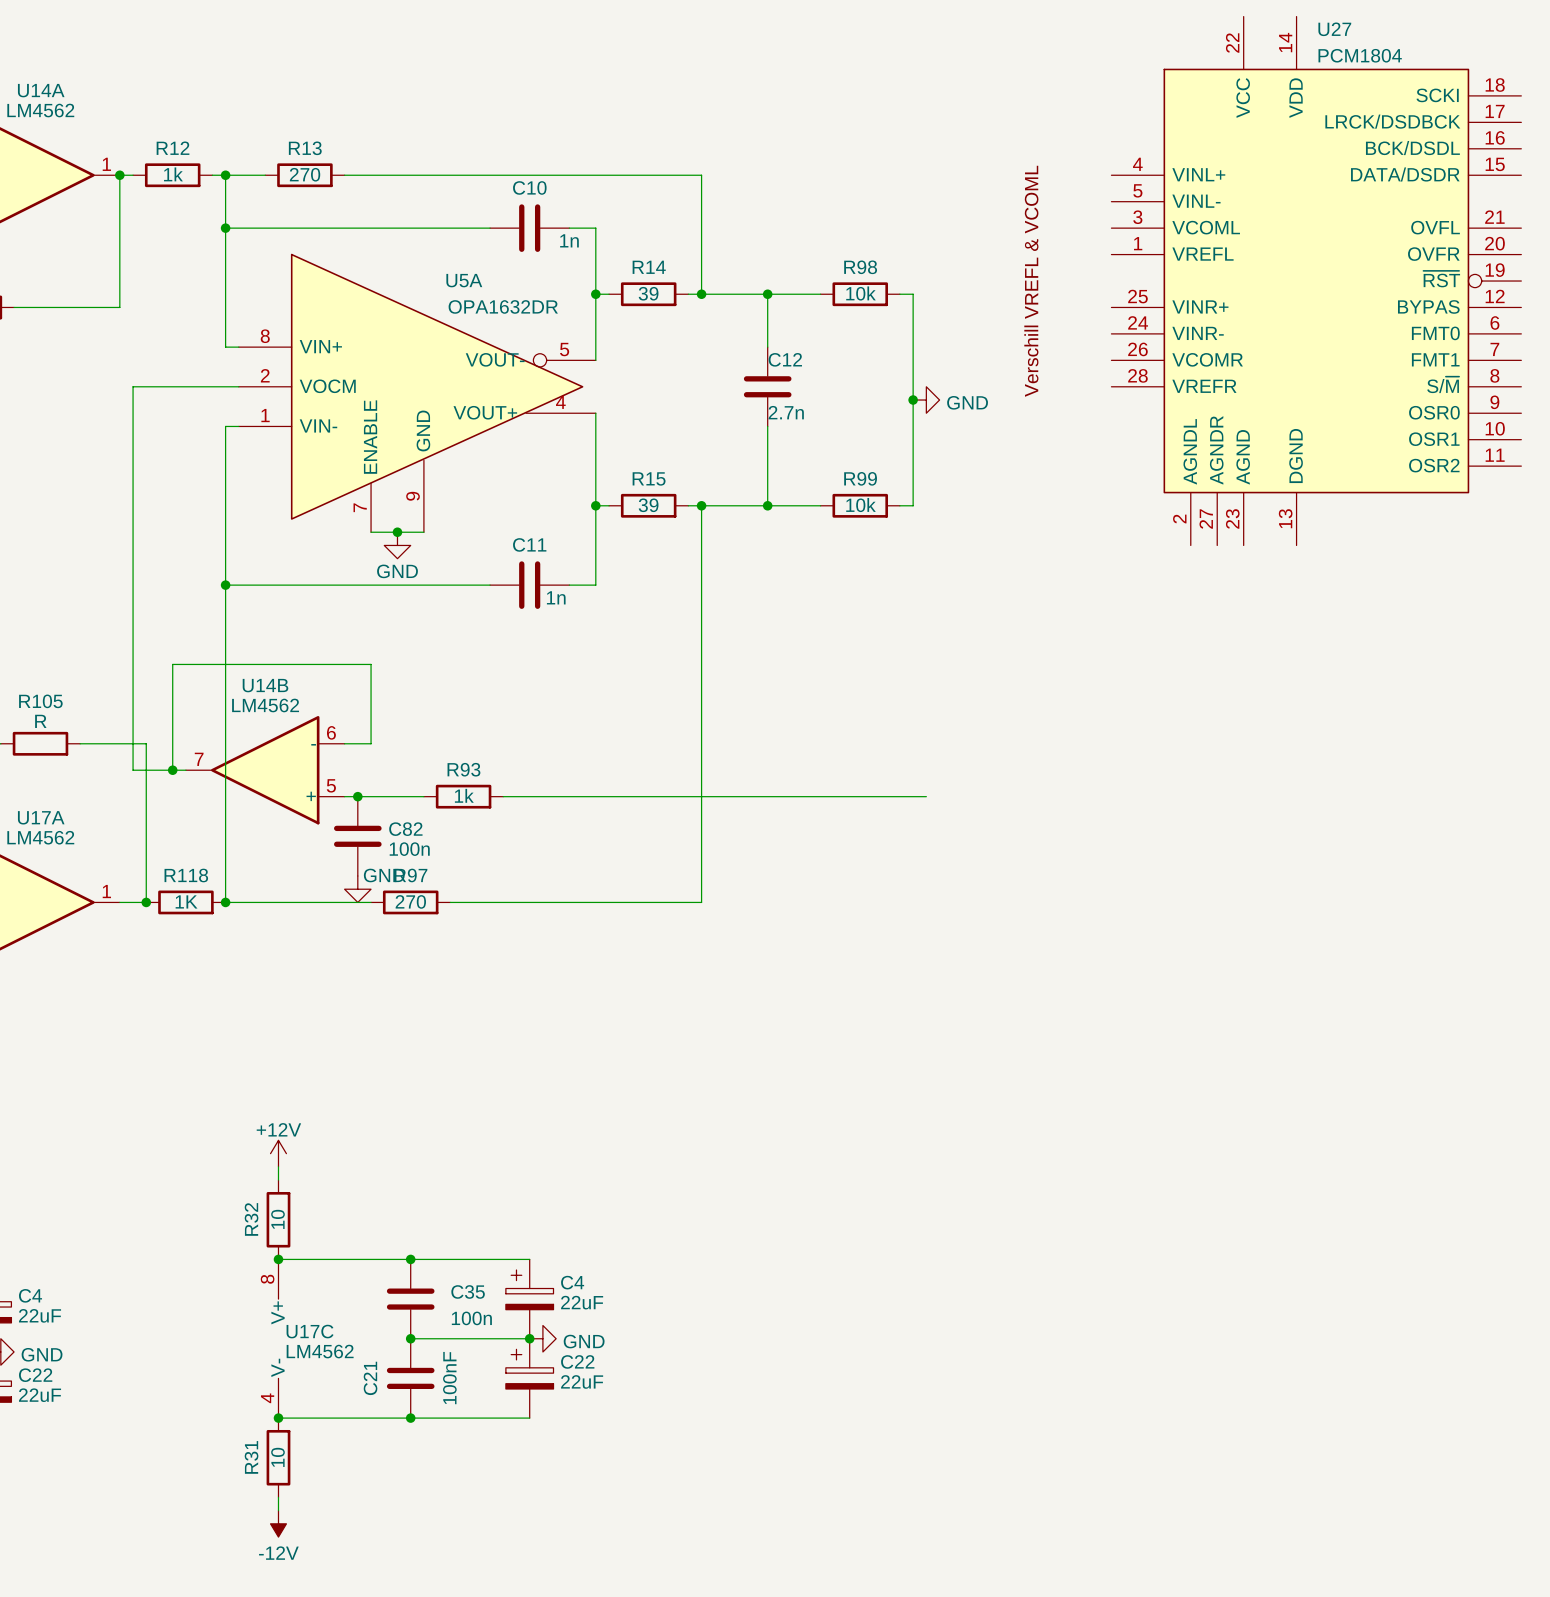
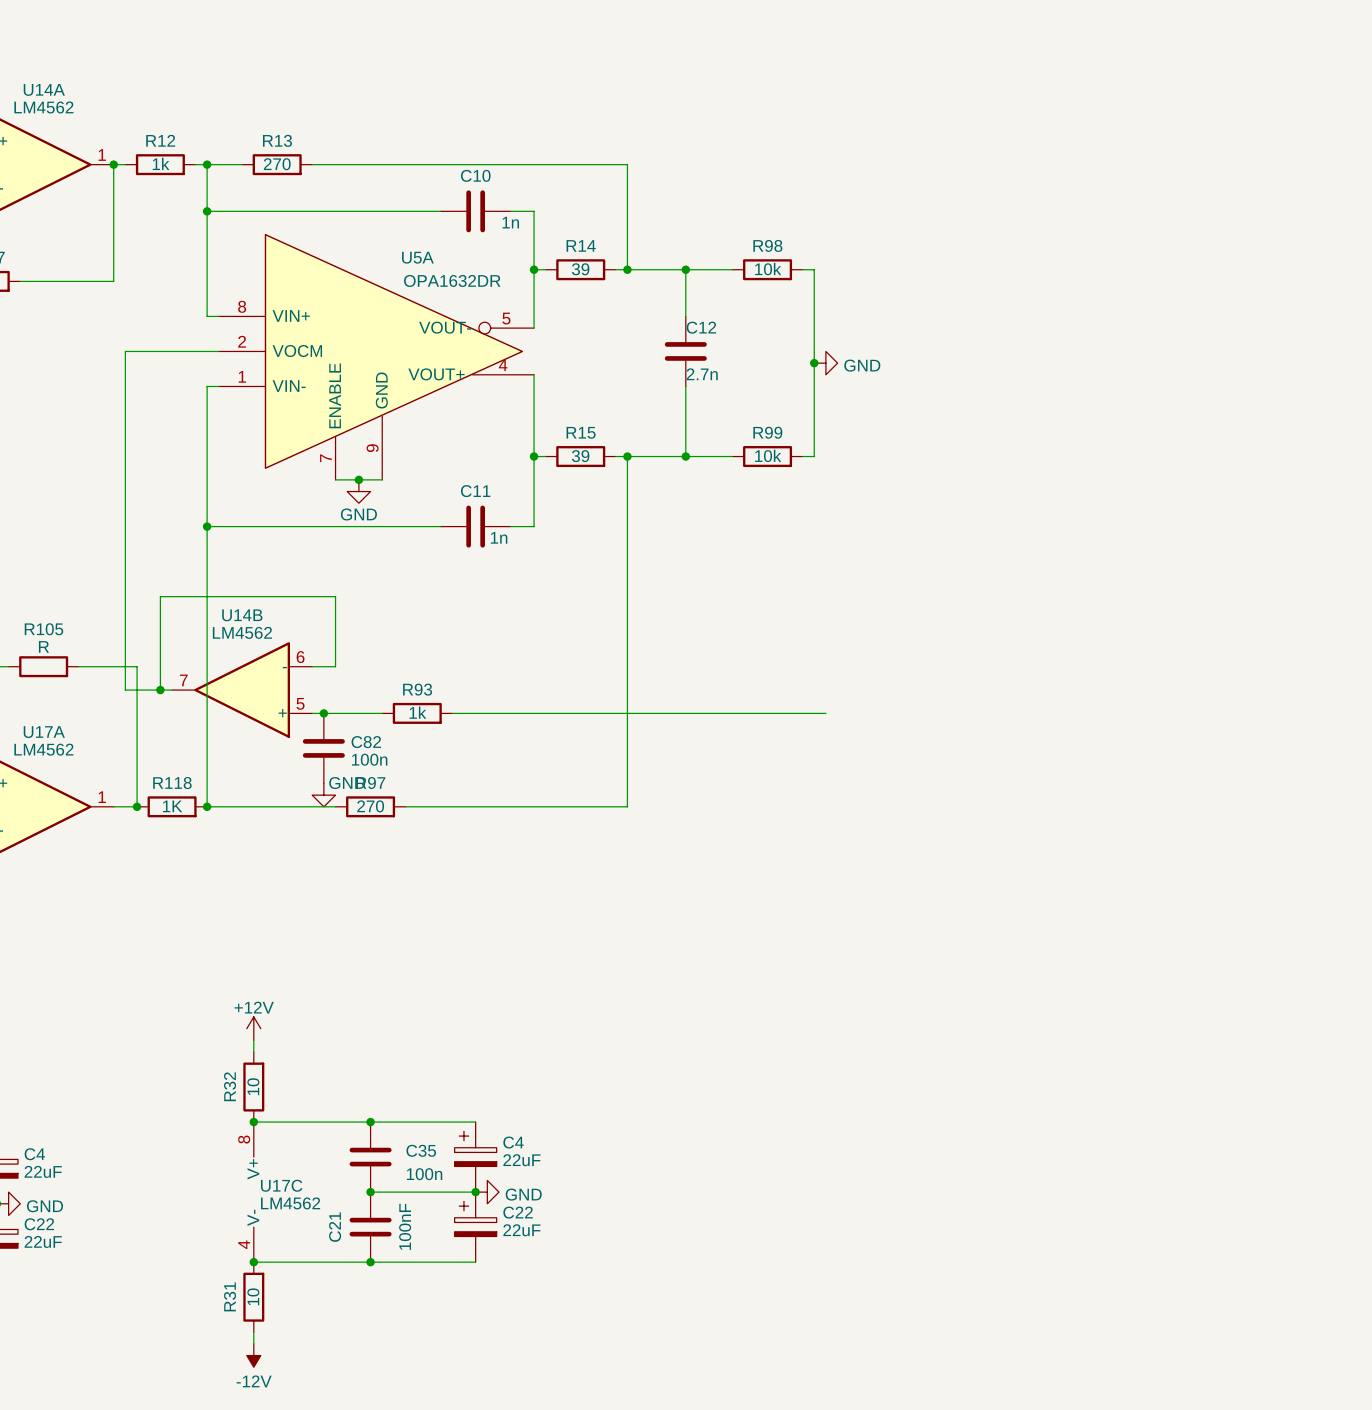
U27: PCM1804 (1316, 281) -> none

